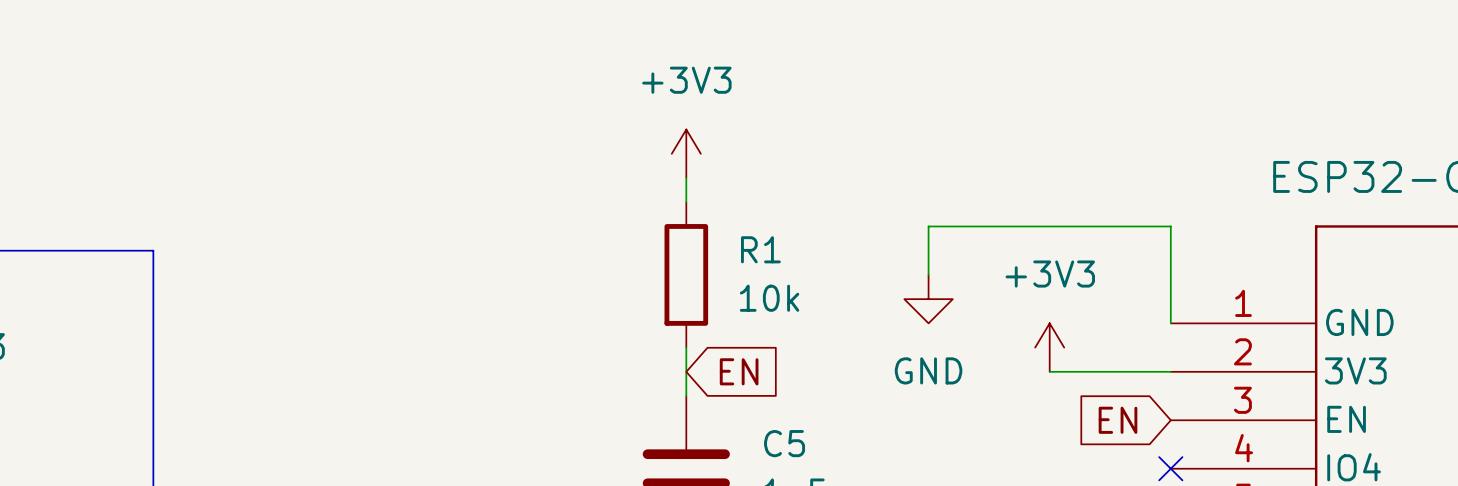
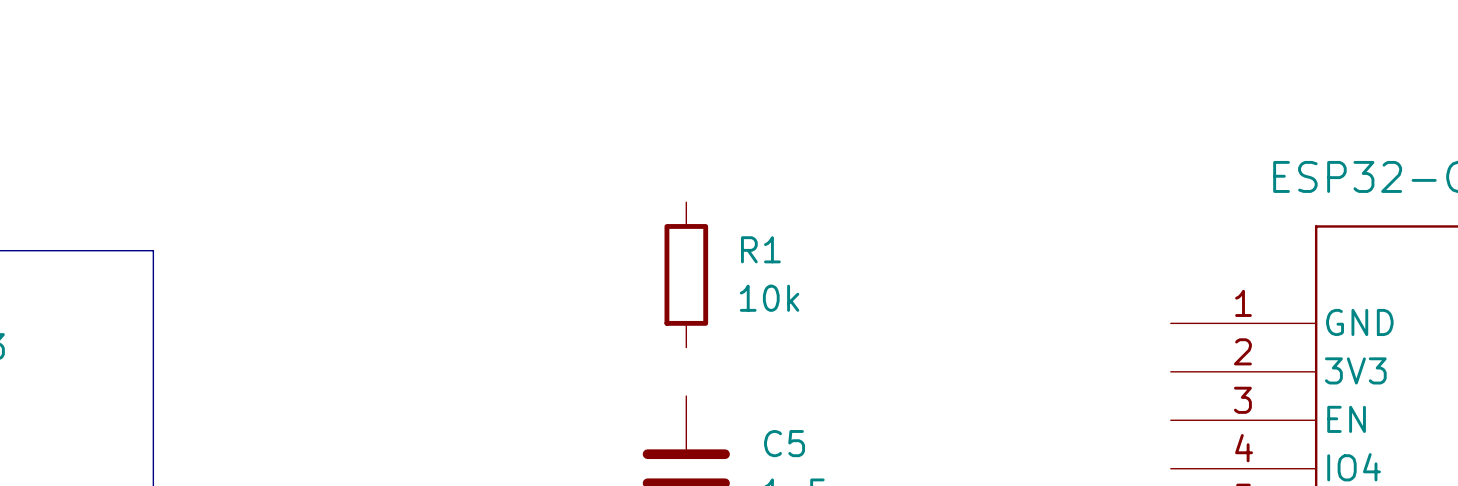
power symbol: +3V3 (686, 153) -> none
wire: (686, 178) (686, 202) -> none
wire: (928, 274) (928, 226) (1170, 226) (1170, 323) -> none
power symbol: GND (928, 299) -> none
wire: (686, 347) (686, 396) -> none
power symbol: +3V3 (1049, 347) -> none
global label: EN (739, 371) -> none
wire: (1049, 371) (1170, 371) -> none
global label: EN (1118, 420) -> none
no-connect mark: (1170, 468) -> none

